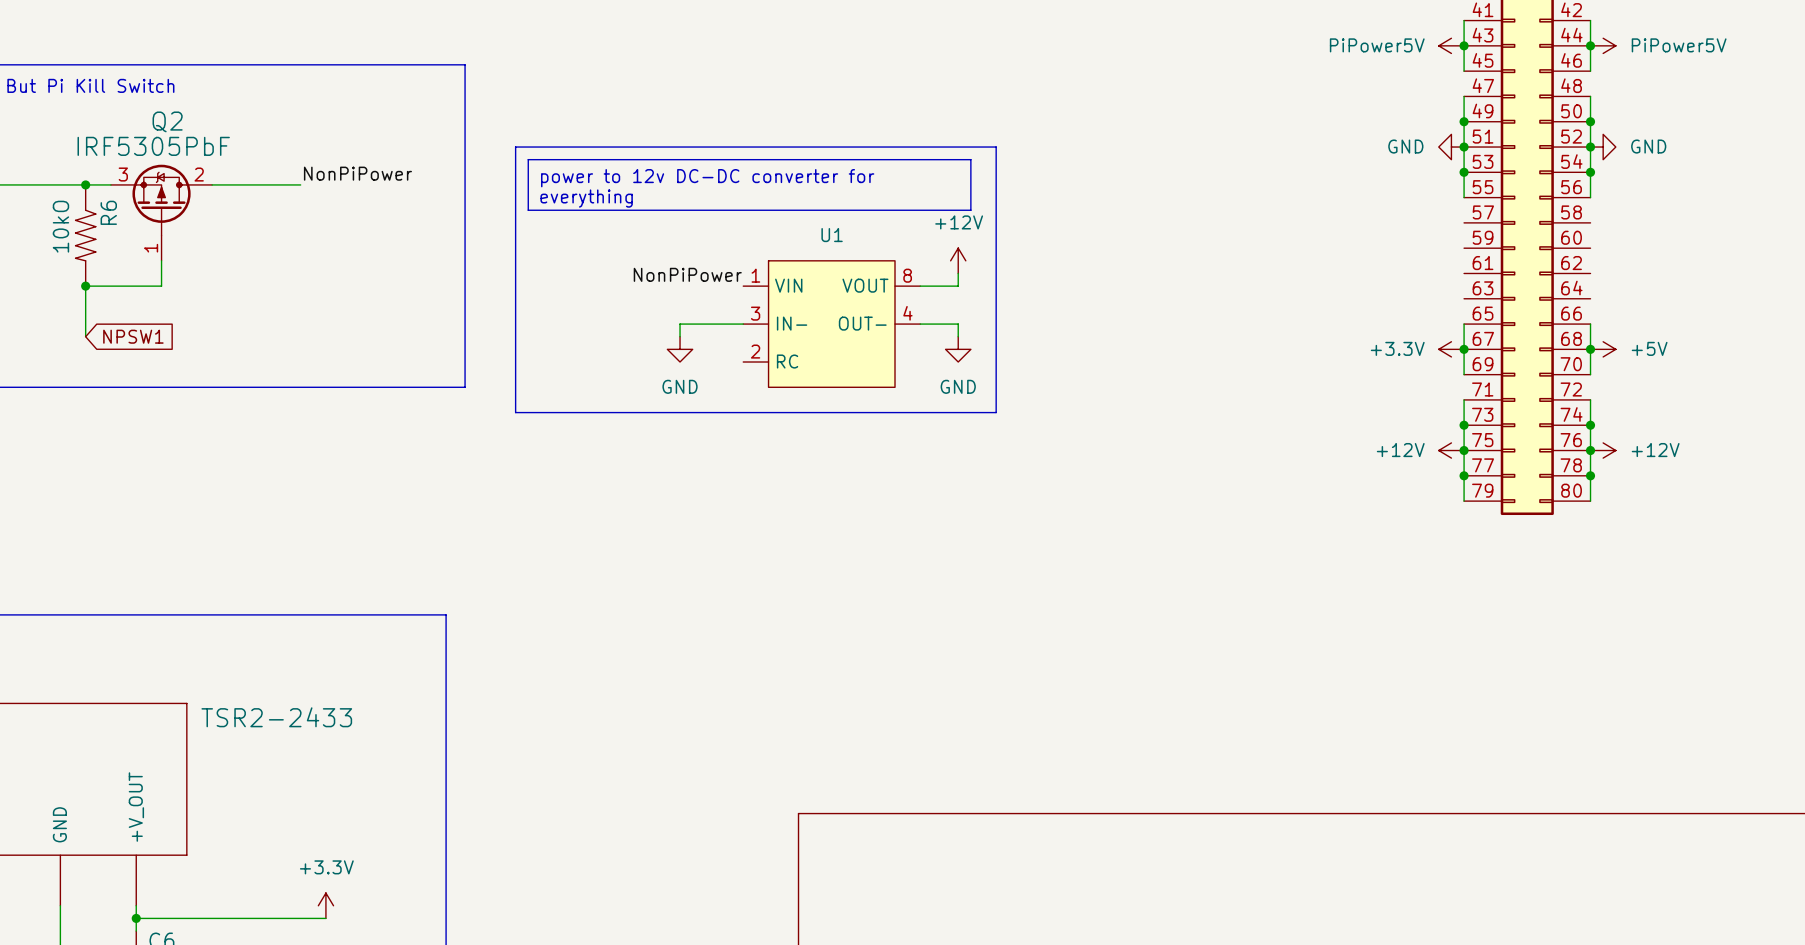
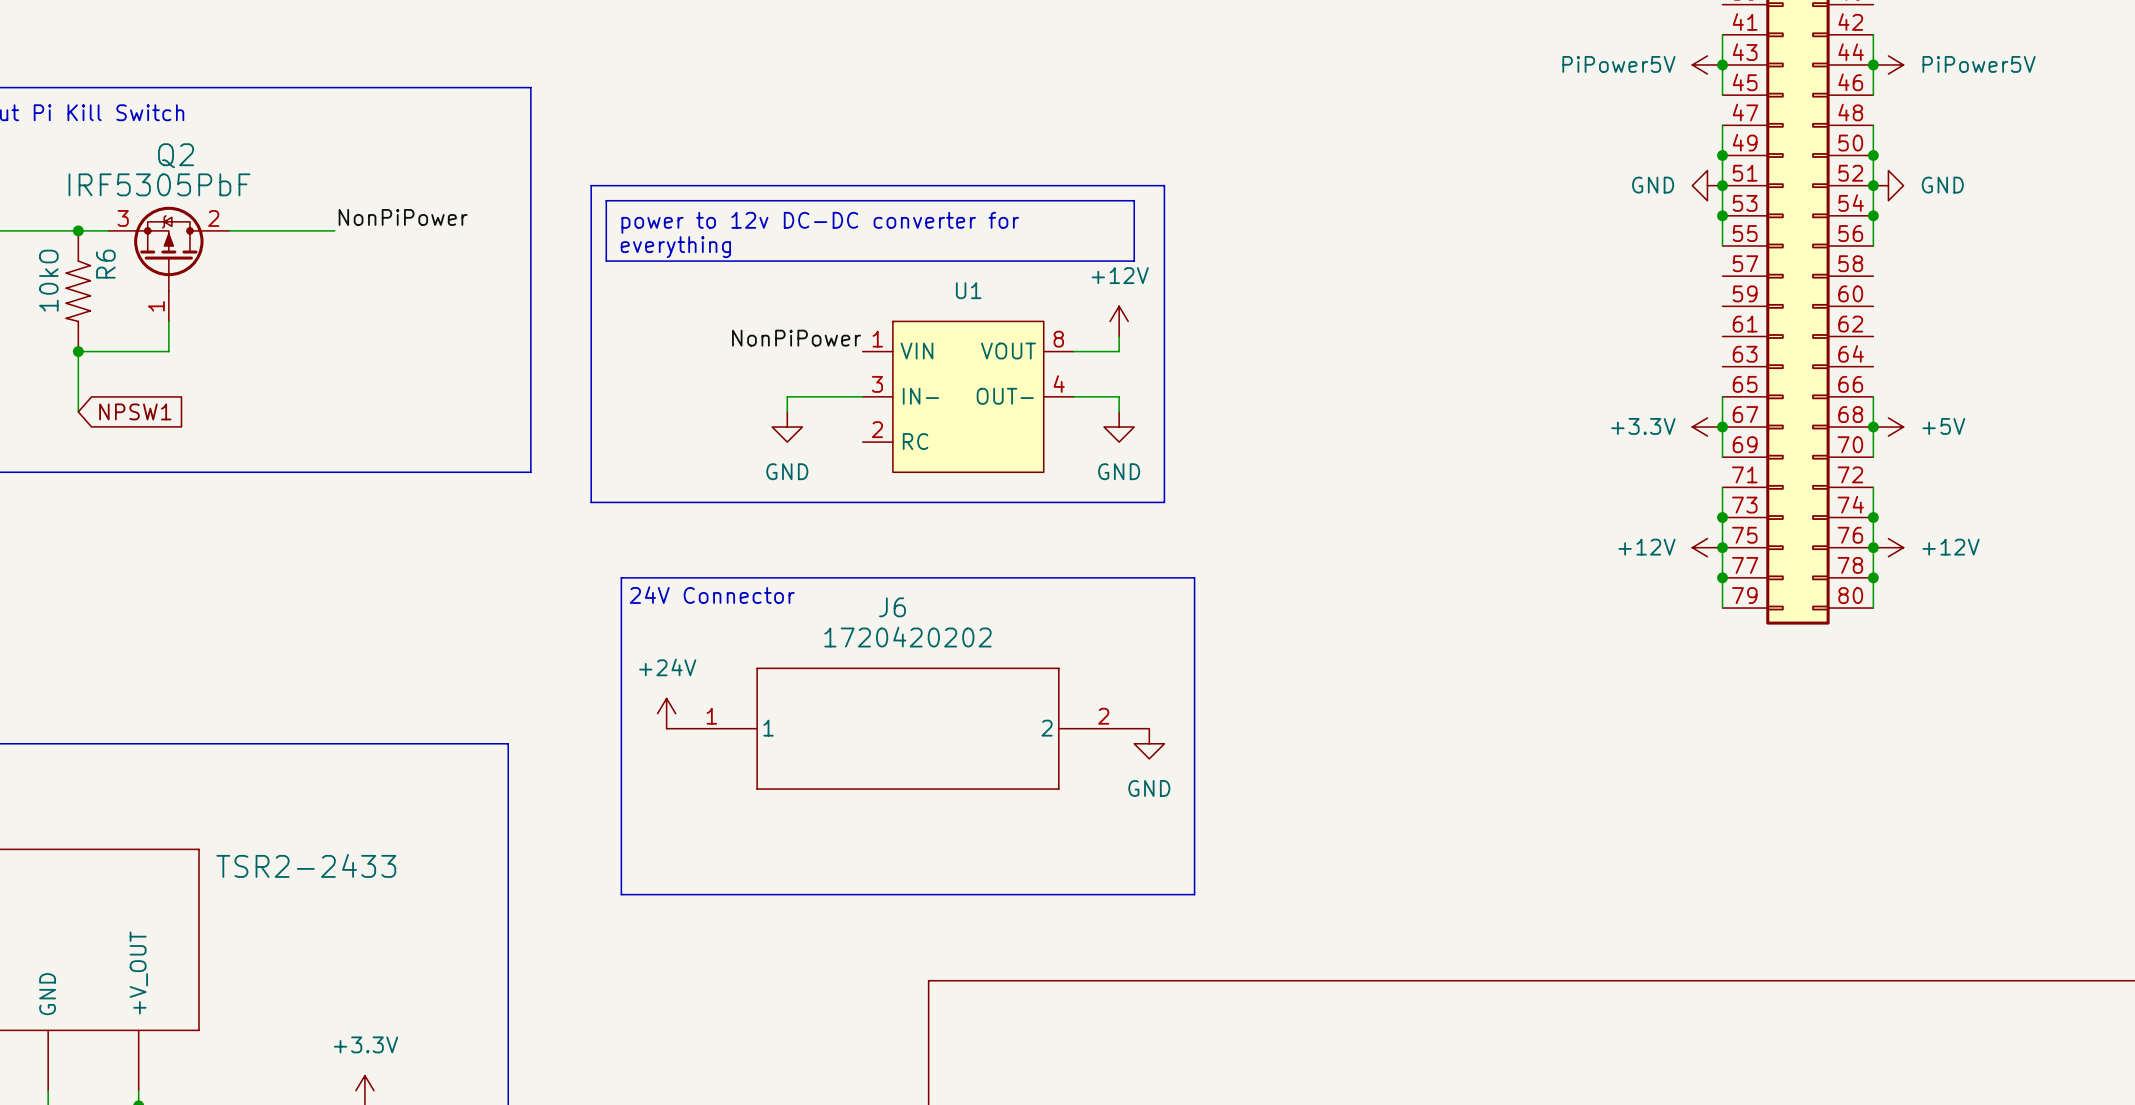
line: none -> (621, 577) (1194, 577) (1194, 894) (621, 894) (621, 577)
text: none -> 24V Connector (712, 595)
power symbol: none -> +24V (666, 713)
J6: none -> 1720420202 (907, 728)
power symbol: none -> GND (1149, 743)

